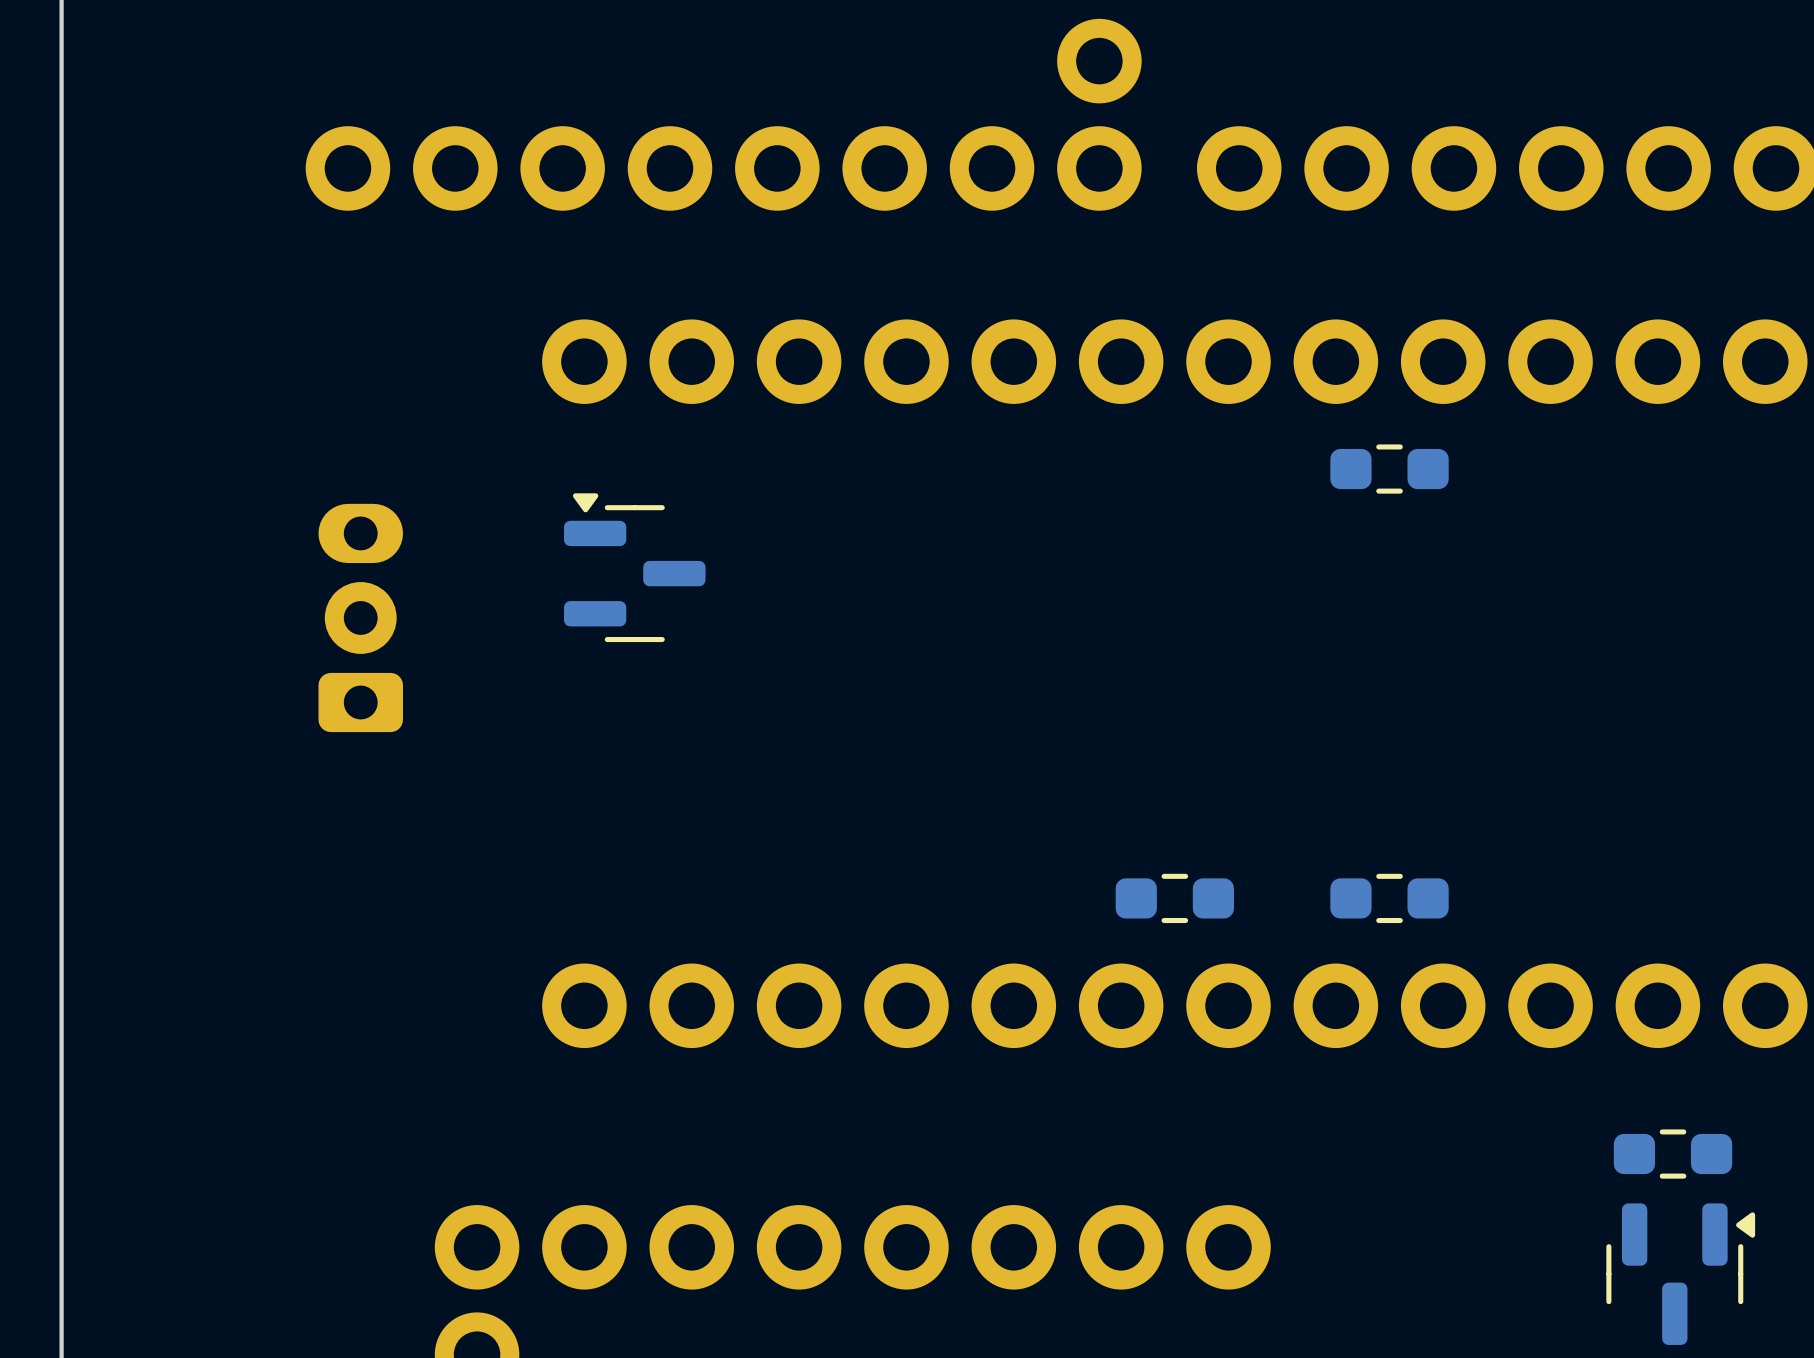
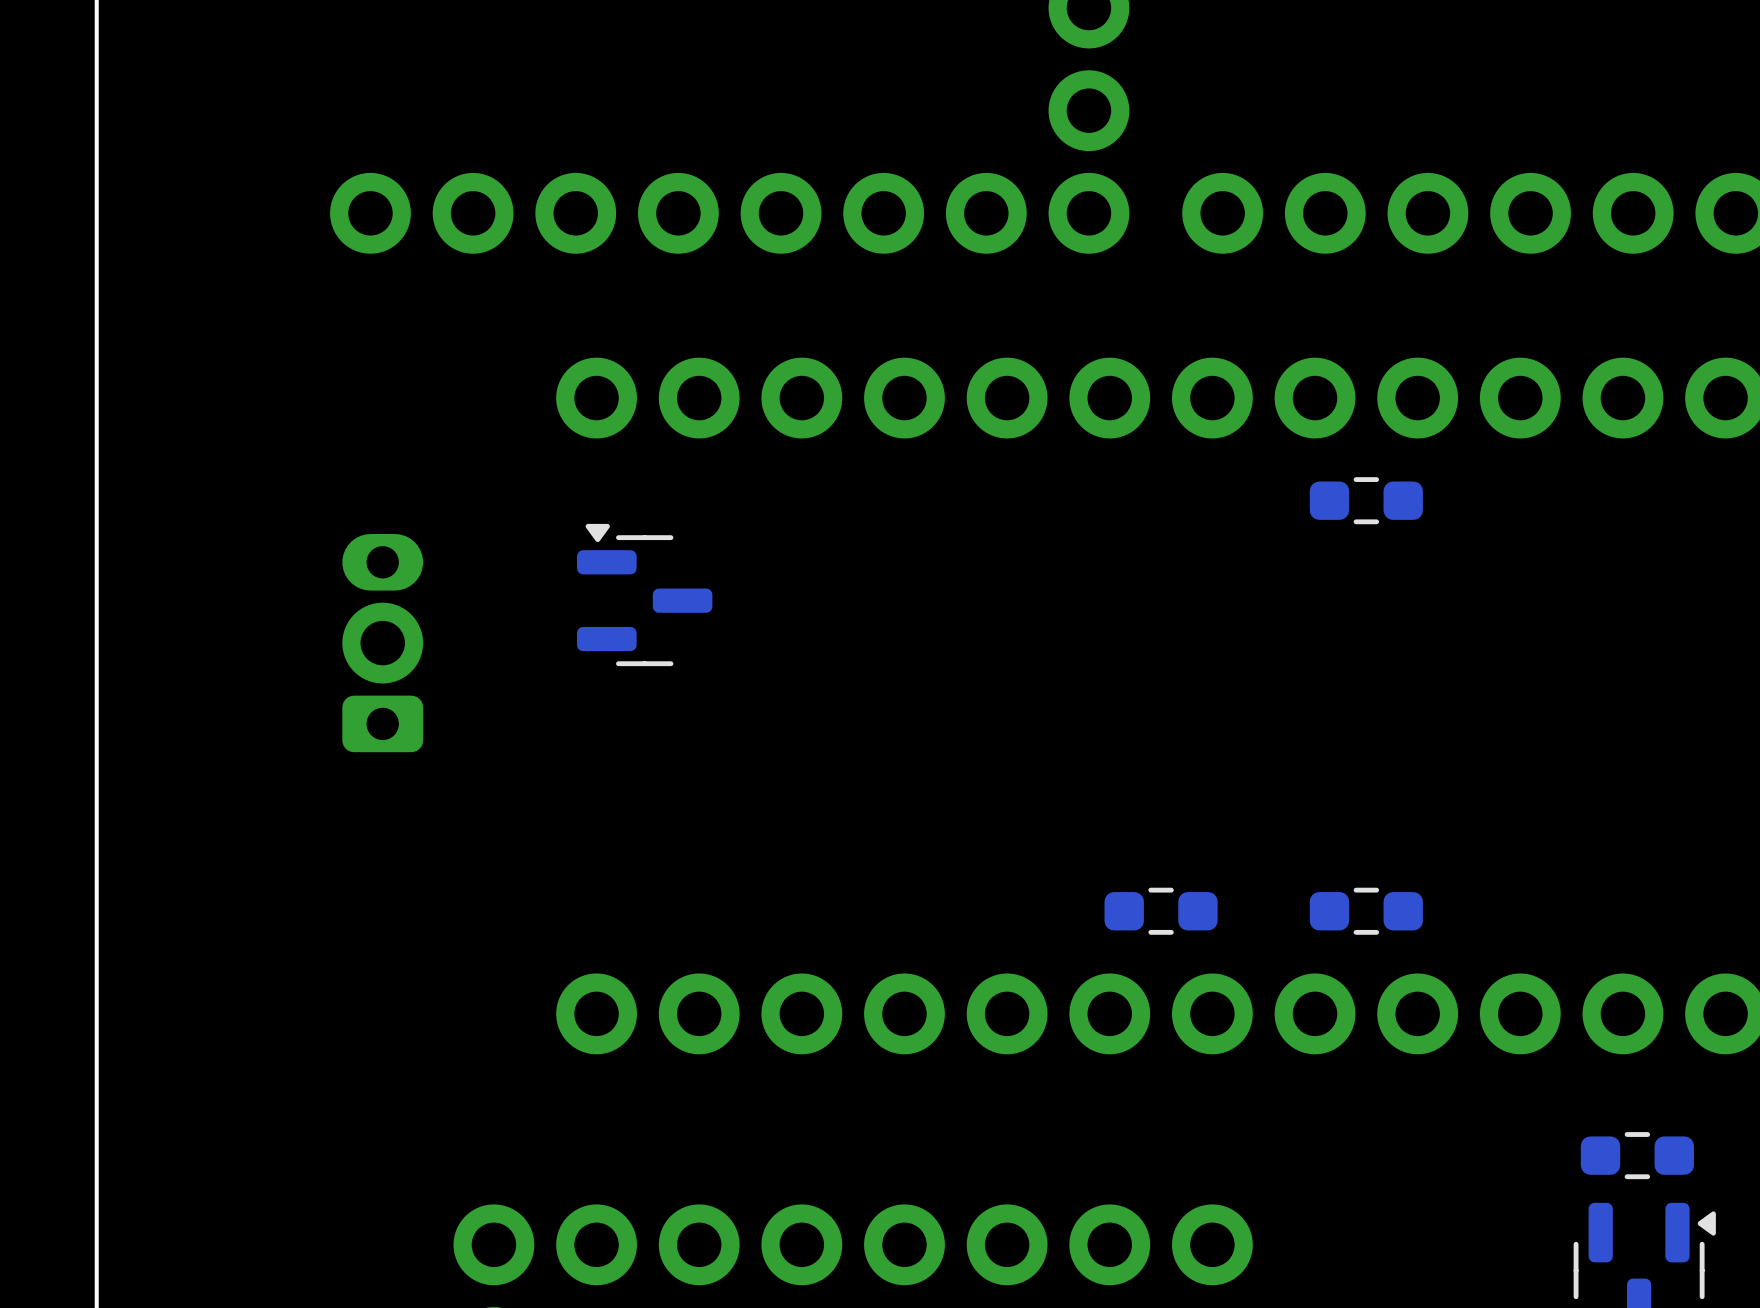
part footprint: [318, 503, 404, 733] -> [342, 533, 424, 753]

